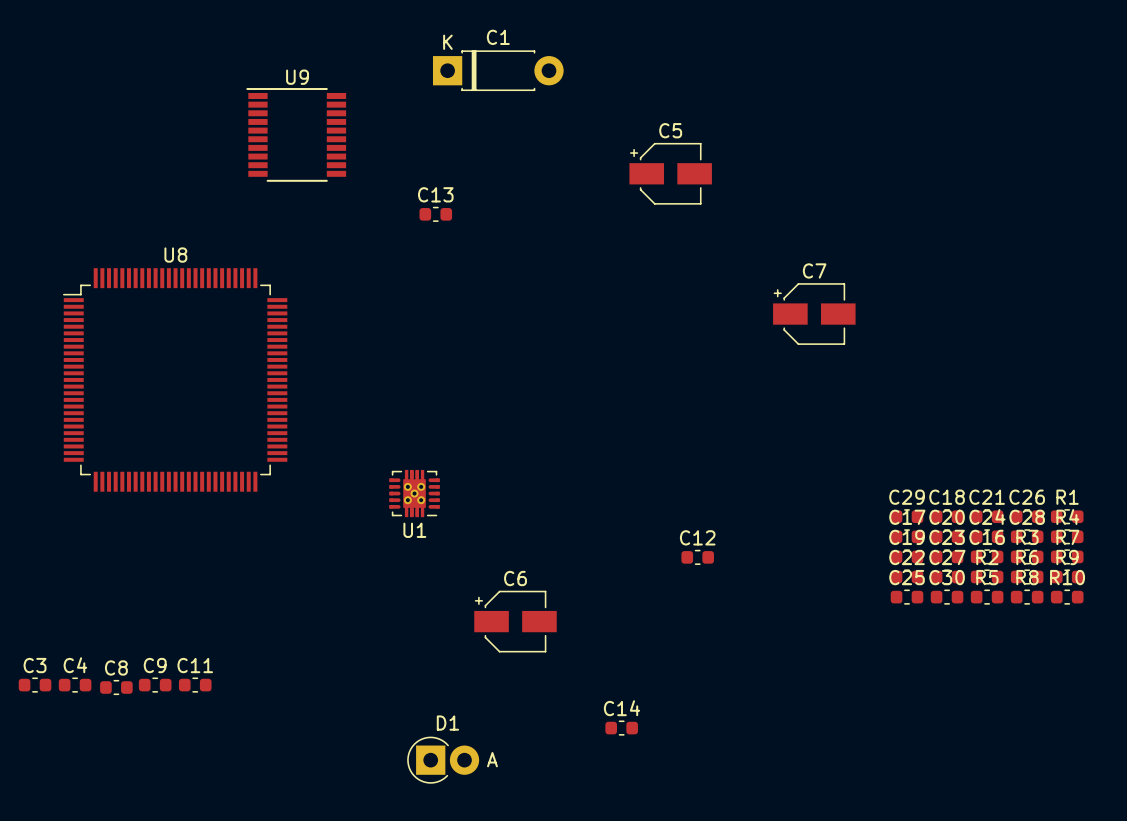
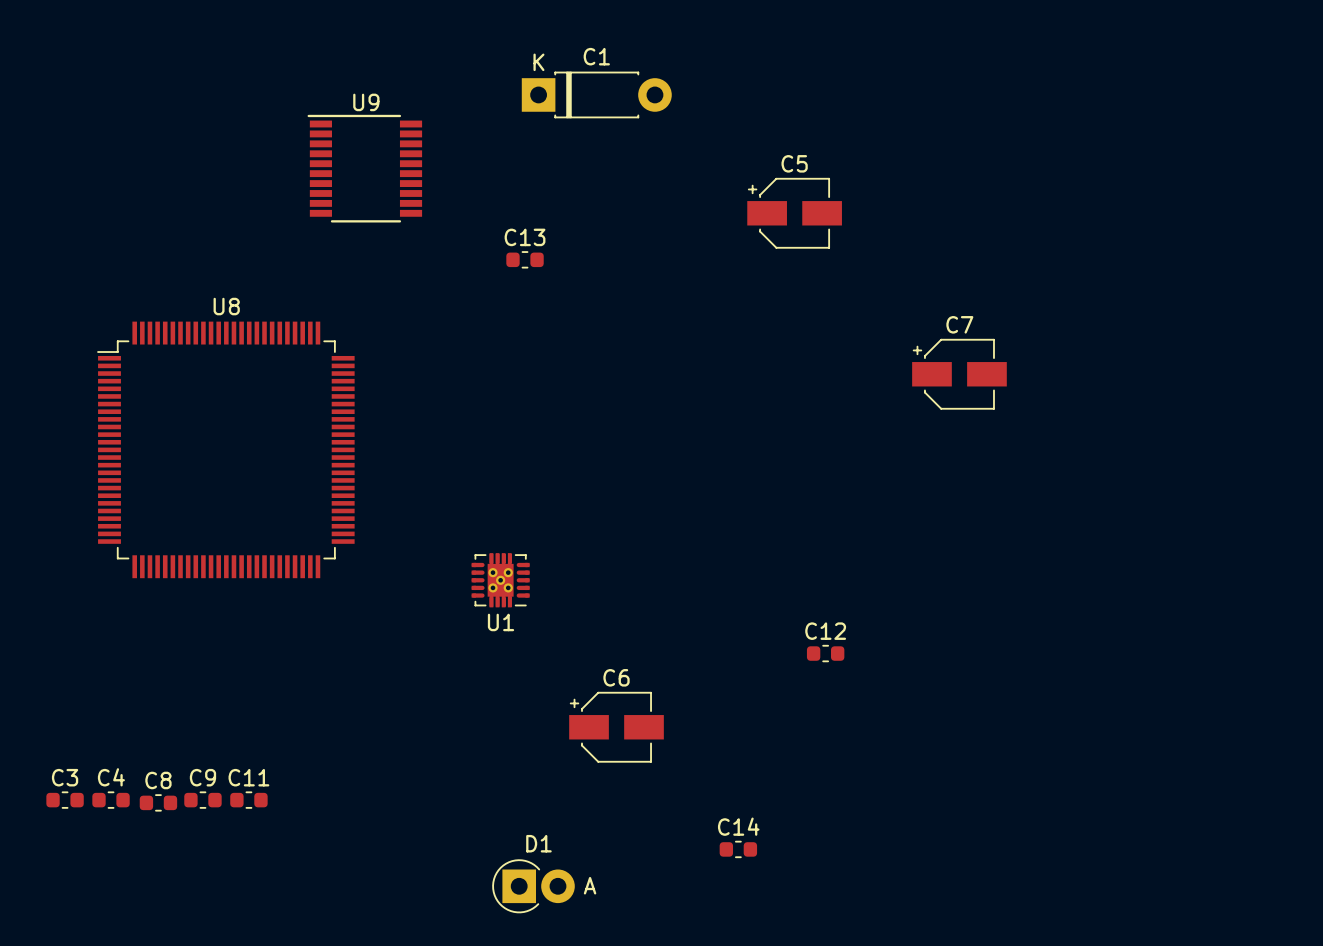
C29: (907, 516) -> none
C18: (947, 516) -> none
C21: (987, 516) -> none
C26: (1027, 516) -> none
R1: (1067, 516) -> none
C17: (907, 536) -> none
C20: (947, 536) -> none
C24: (987, 536) -> none
C28: (1027, 536) -> none
R4: (1067, 536) -> none
C19: (907, 556) -> none
C23: (947, 556) -> none
C16: (987, 556) -> none
R3: (1027, 556) -> none
R7: (1067, 556) -> none
C22: (907, 577) -> none
C27: (947, 577) -> none
R2: (987, 577) -> none
R6: (1027, 577) -> none
R9: (1067, 577) -> none
C25: (907, 597) -> none
C30: (947, 597) -> none
R5: (987, 597) -> none
R8: (1027, 597) -> none
R10: (1067, 597) -> none

